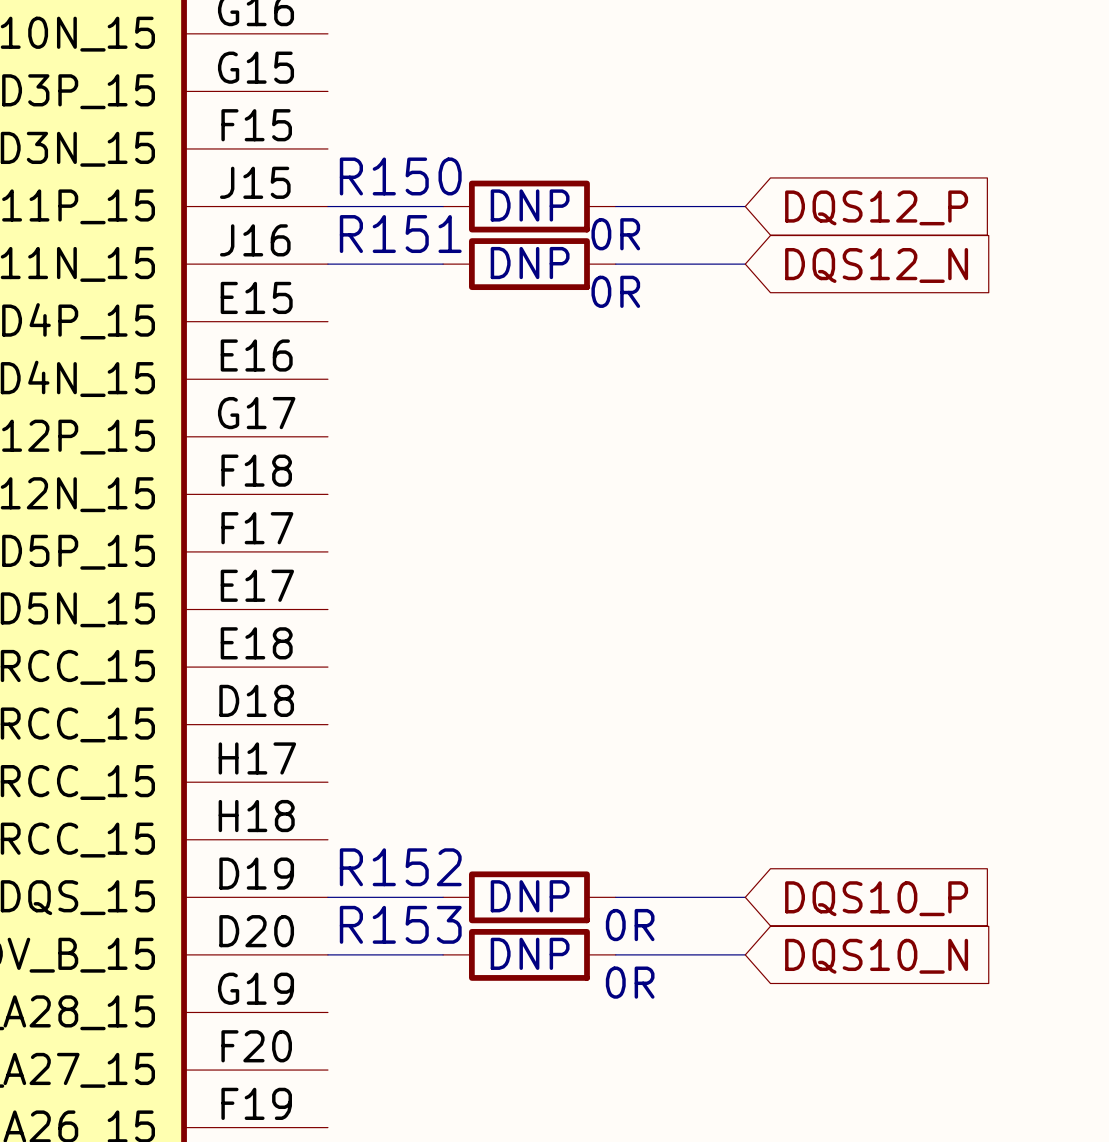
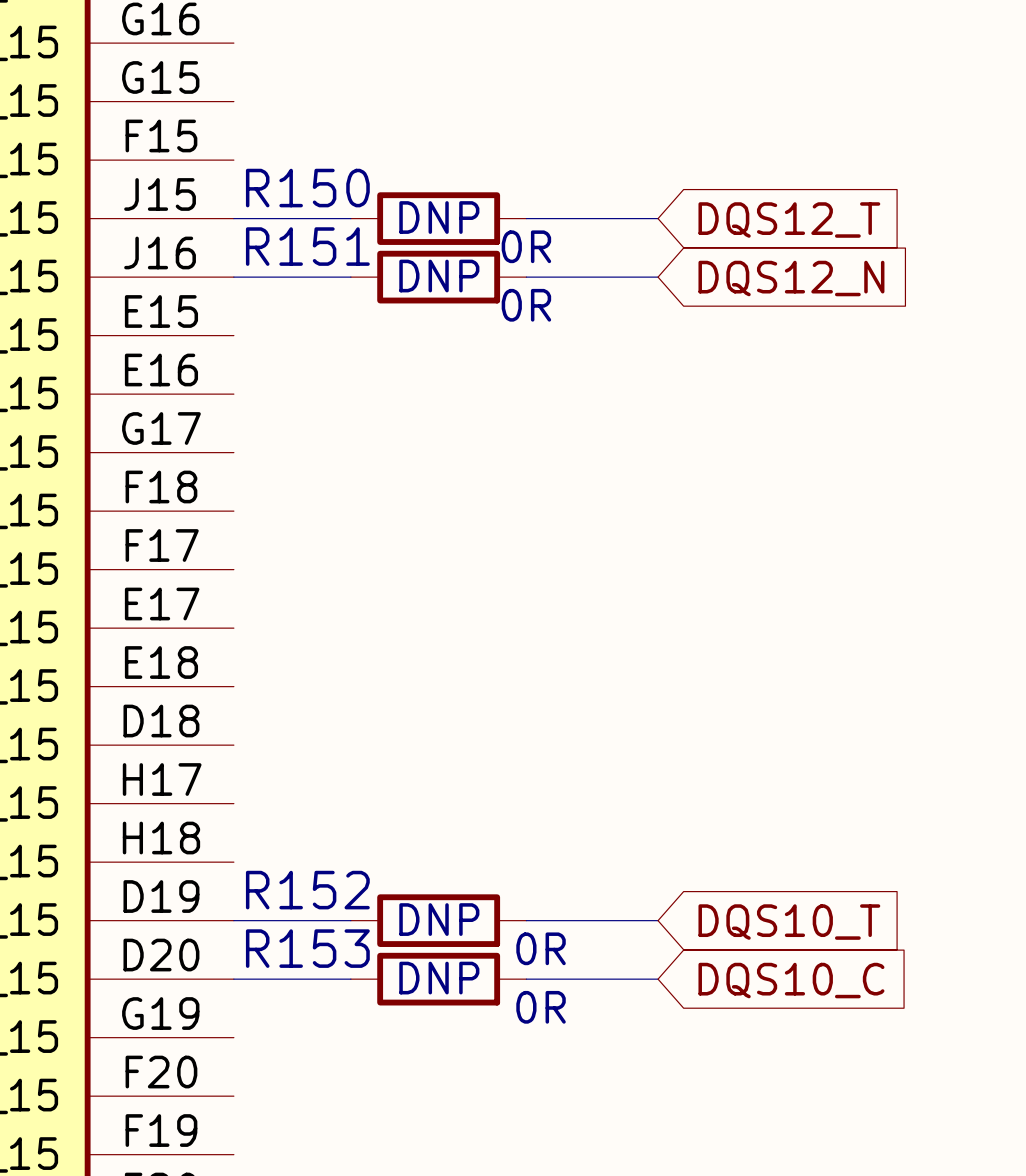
global label: DQS12_P (876, 207) -> DQS12_T (789, 220)
global label: DQS10_P (876, 898) -> DQS10_T (789, 922)
global label: DQS10_N (876, 956) -> DQS10_C (791, 980)

